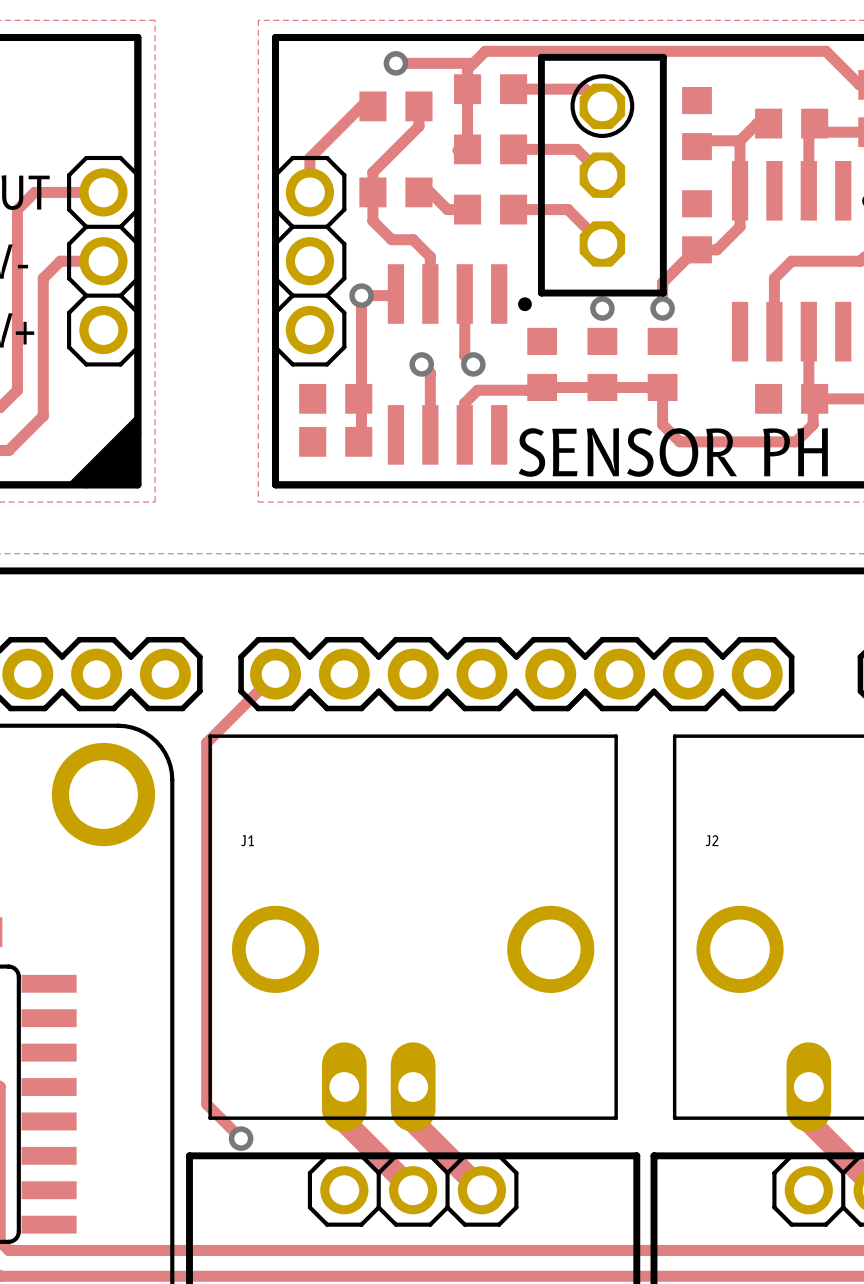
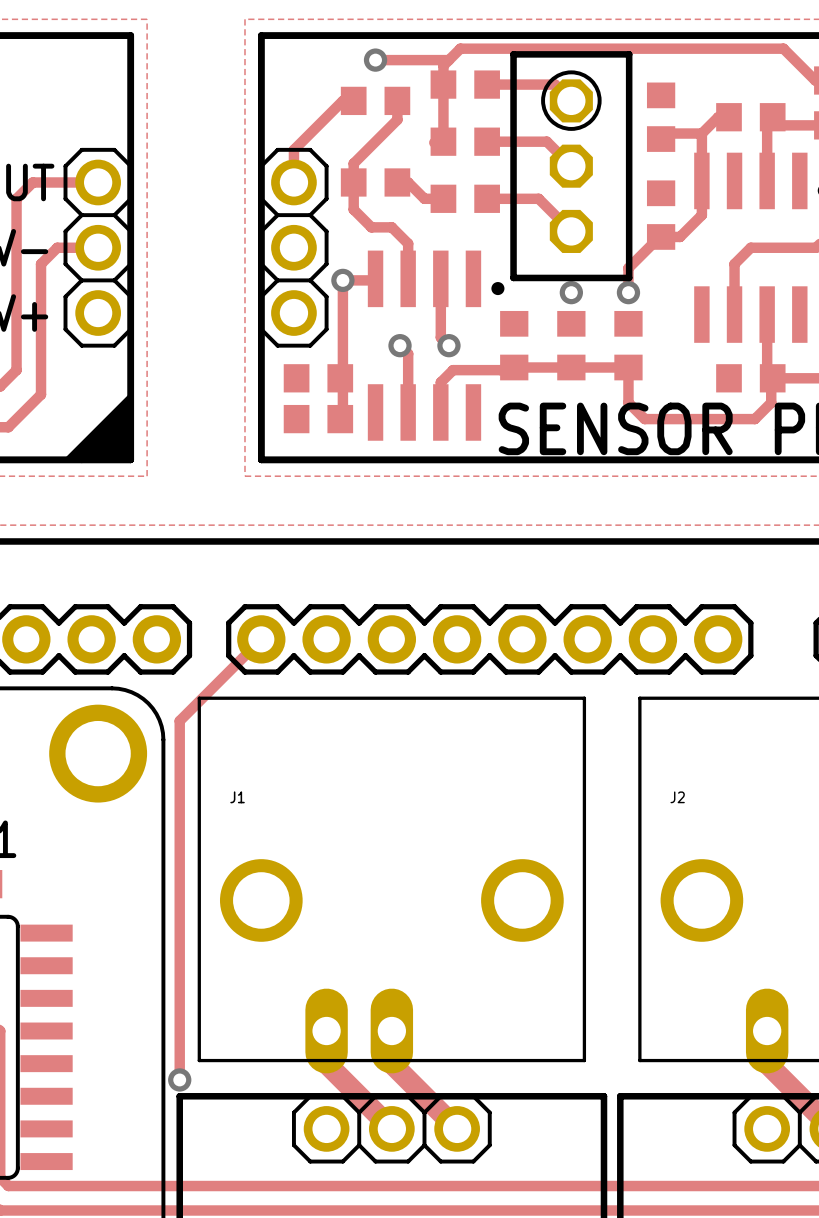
track: (206, 742) (206, 1104) (241, 1138) -> (196, 704) (179, 720) (179, 1079)
via position: (241, 1138) -> (179, 1079)

